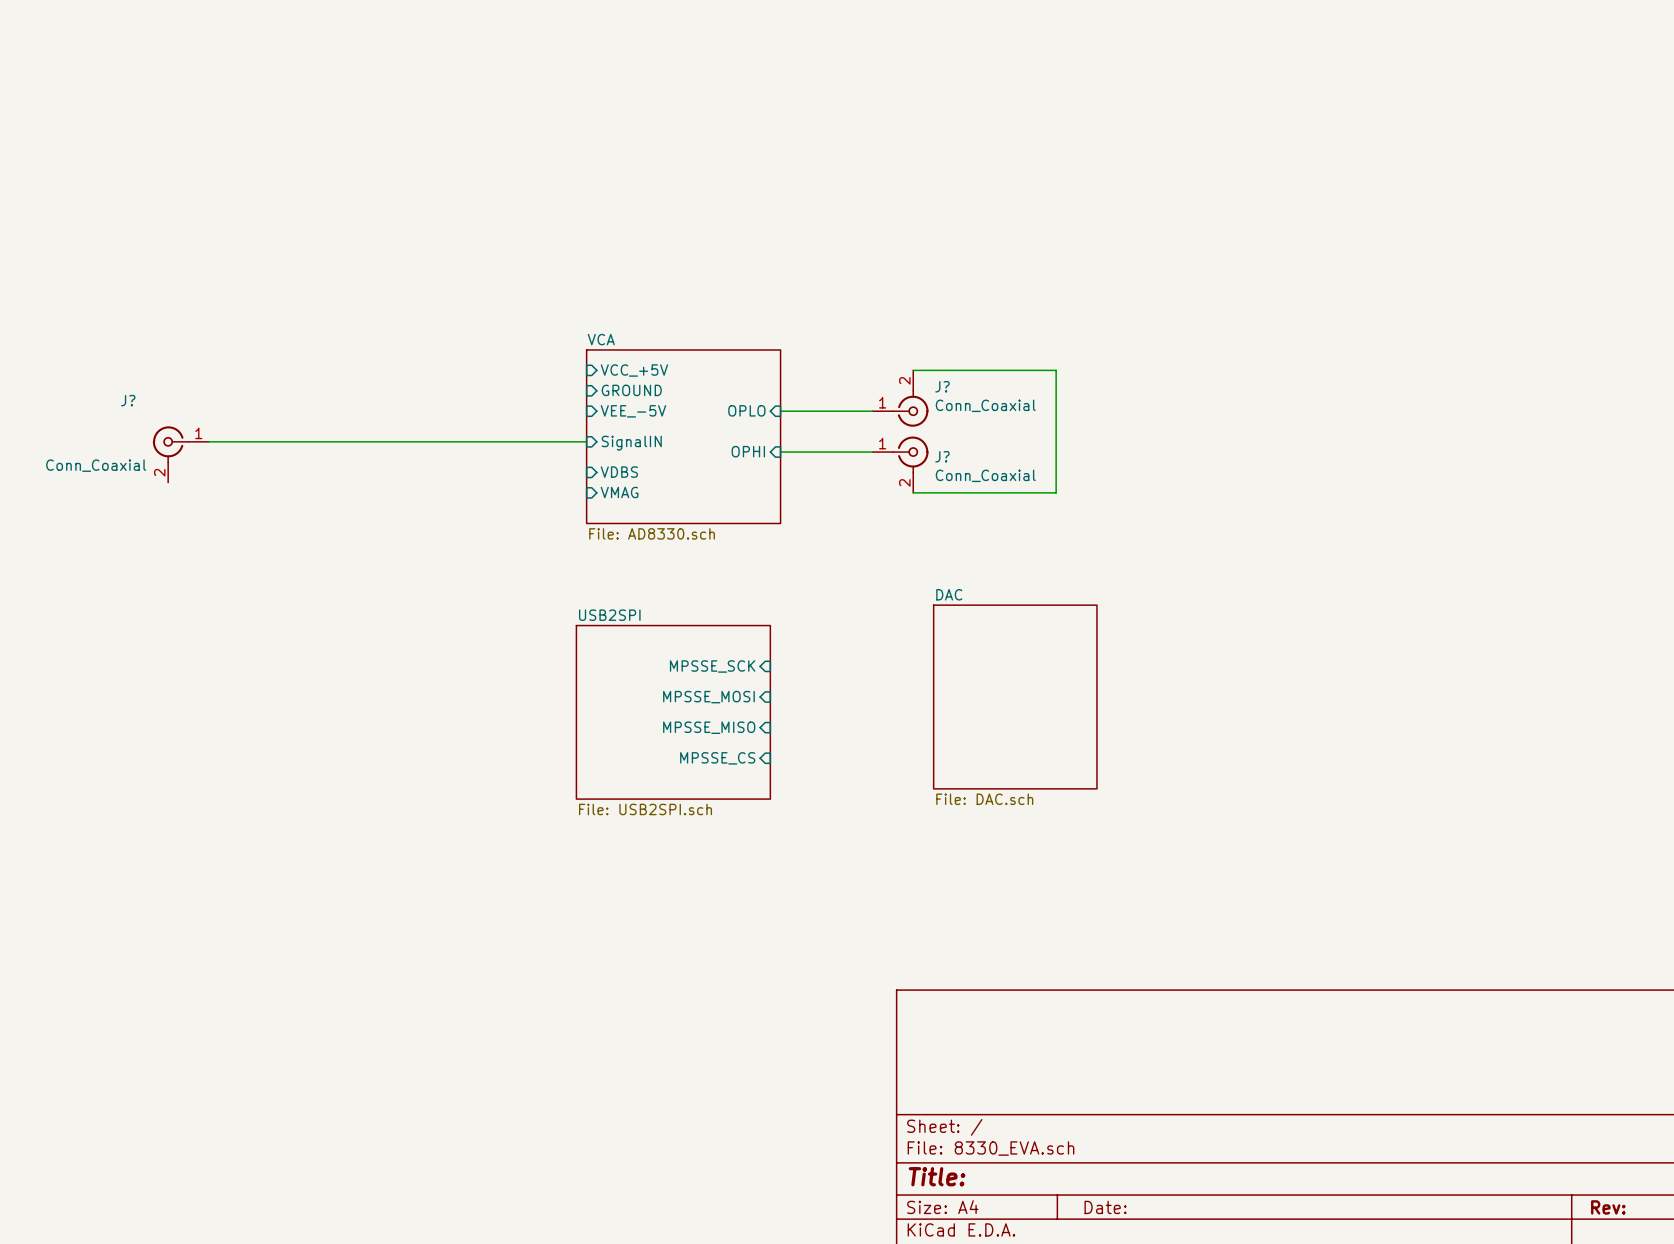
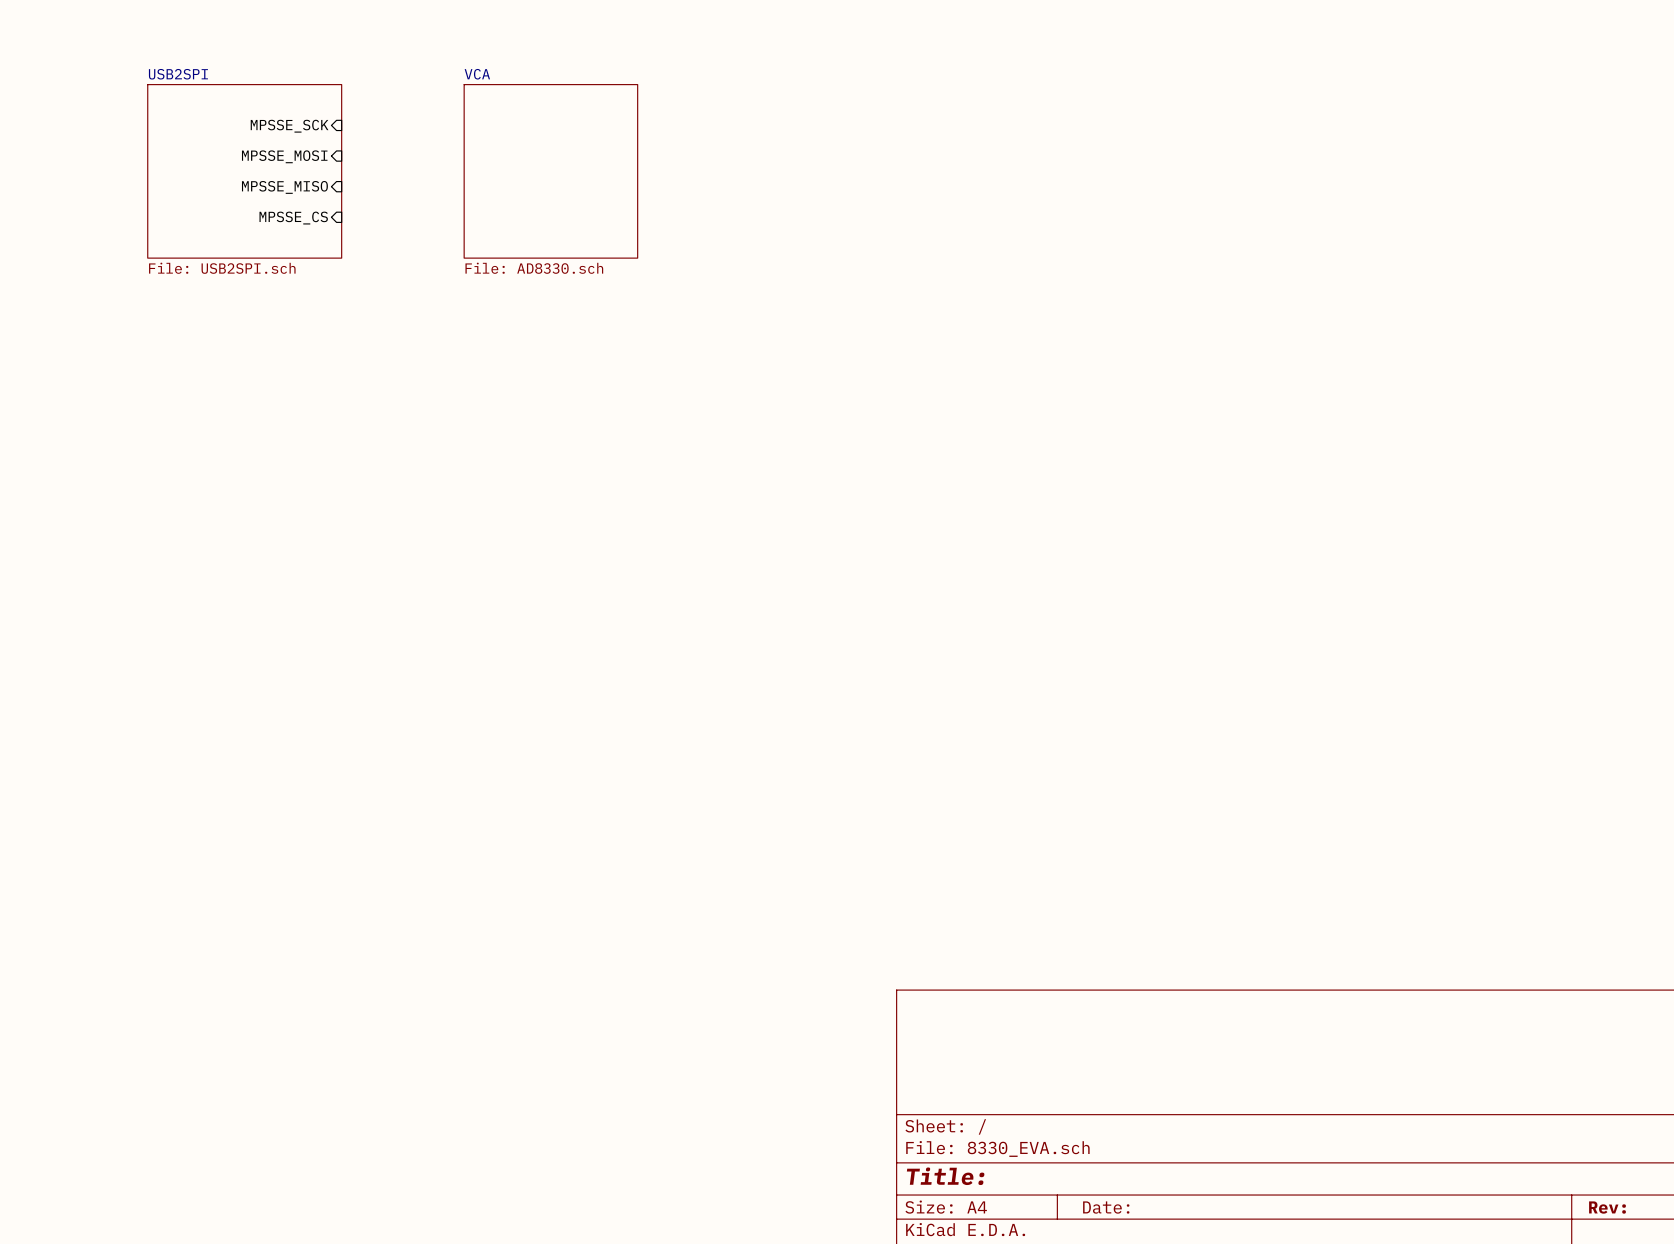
sheet pin: none -> MPSSE_SCK (289, 126)
sheet pin: none -> MPSSE_MOSI (284, 156)
sheet VCA: none -> File: AD8330.sch (550, 171)
sheet pin: none -> MPSSE_MISO (284, 187)
sheet pin: none -> MPSSE_CS (293, 218)
sheet pin: VCC_+5V (634, 370) -> none
wire: (913, 370) (1056, 370) (1056, 492) (913, 492) -> none
sheet pin: GROUND (631, 390) -> none
J?: Conn_Coaxial (900, 398) -> none
sheet pin: OPLO (746, 410) -> none
sheet pin: VEE_-5V (633, 411) -> none
wire: (780, 411) (872, 411) -> none
sheet VCA: File: AD8330.sch (683, 436) -> none
wire: (208, 441) (586, 441) -> none
sheet pin: SignalIN (631, 443) -> none
sheet pin: OPHI (748, 451) -> none
wire: (780, 452) (872, 452) -> none
J?: Conn_Coaxial (180, 454) -> none
J?: Conn_Coaxial (900, 464) -> none
sheet pin: VDBS (619, 472) -> none
sheet pin: VMAG (619, 492) -> none
sheet pin: MPSSE_SCK (712, 666) -> none
sheet pin: MPSSE_MOSI (708, 697) -> none
sheet DAC: File: DAC.sch (1015, 697) -> none
sheet USB2SPI position: (673, 712) -> (244, 171)
sheet pin: MPSSE_MISO (709, 727) -> none
sheet pin: MPSSE_CS (717, 758) -> none

